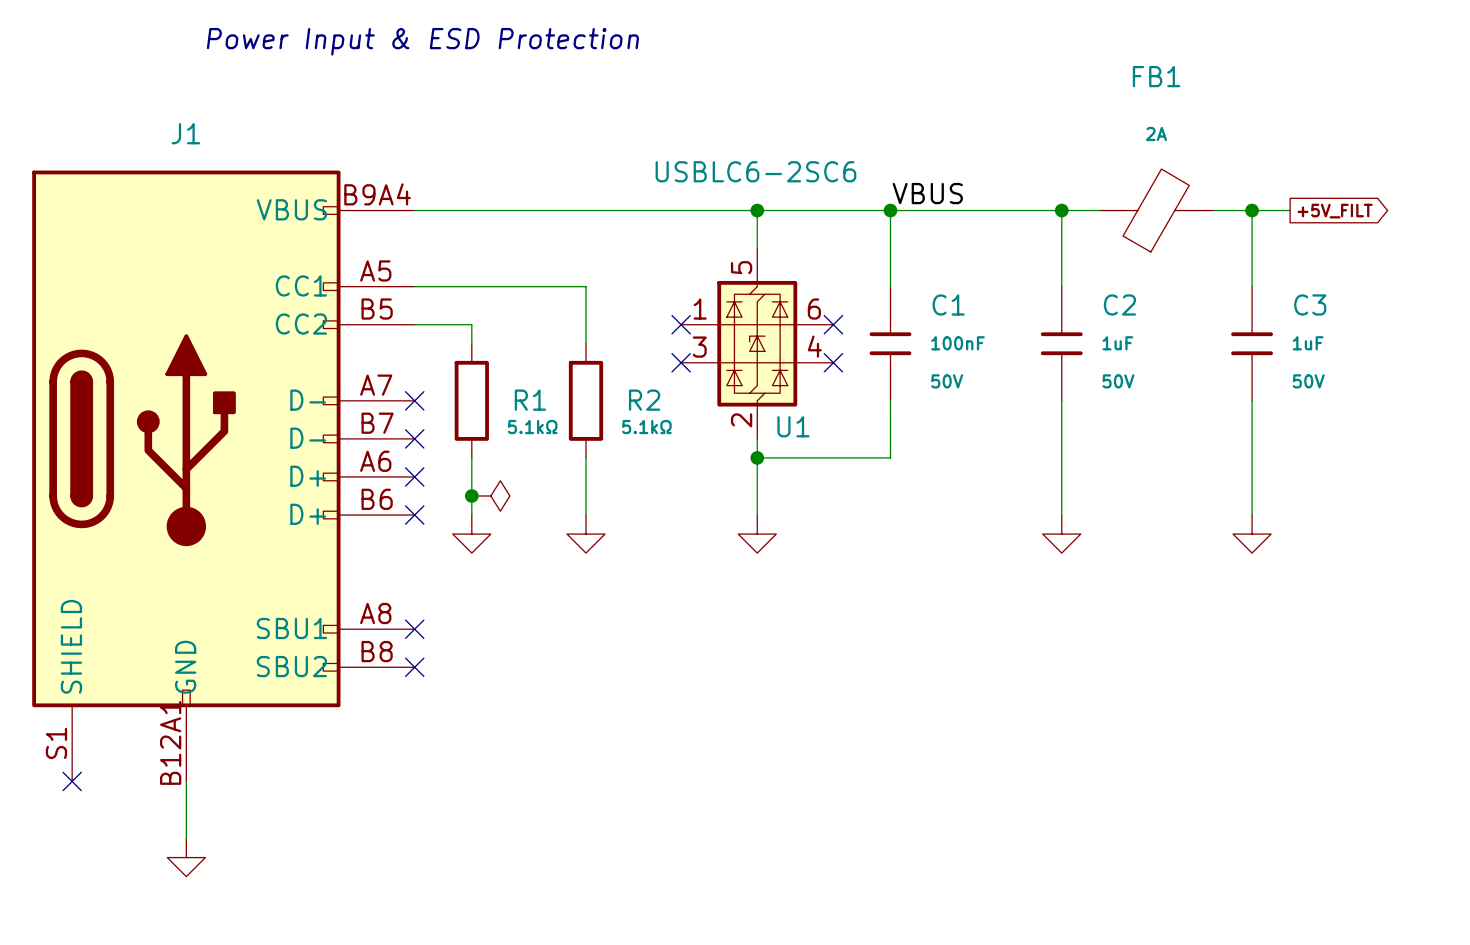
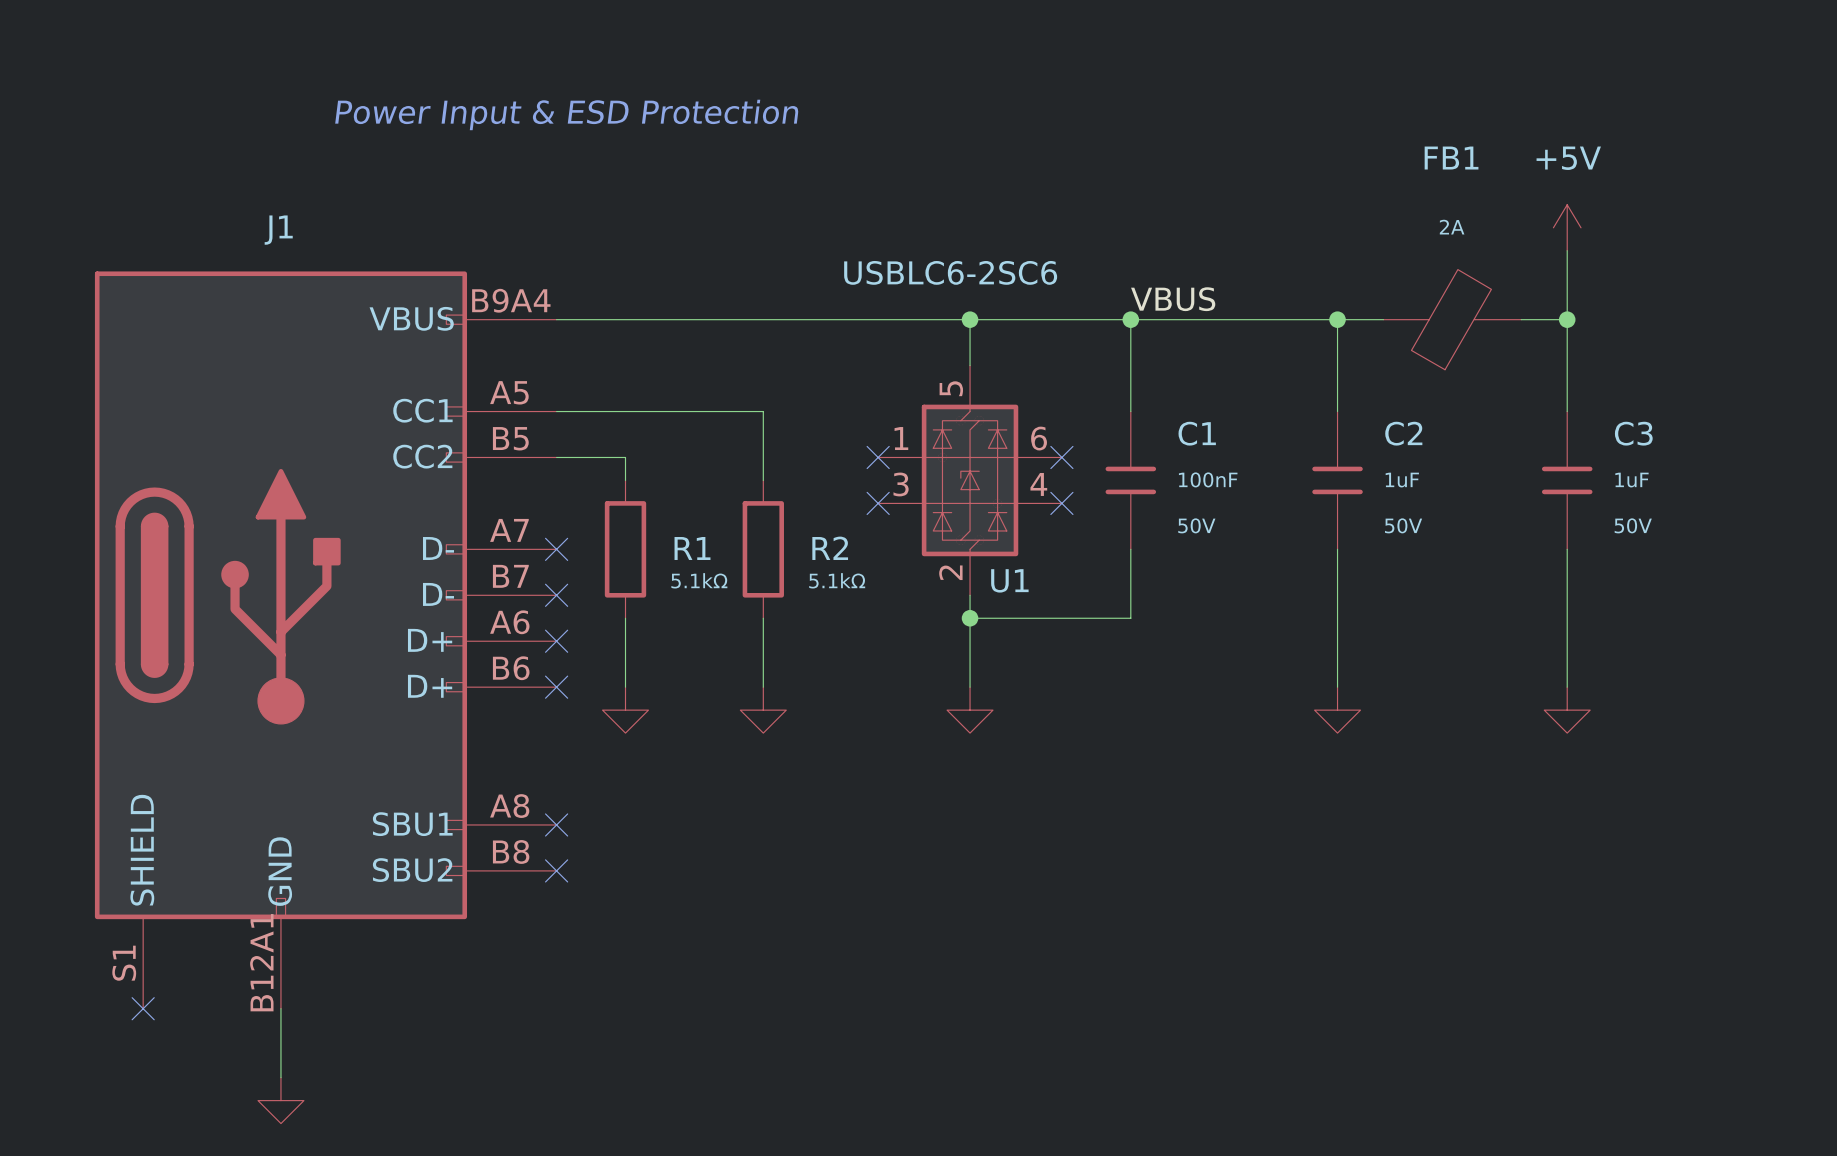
power symbol: none -> +5V (1567, 227)
wire: (1252, 210) (1290, 210) -> (1567, 319) (1567, 250)
global label: +5V_FILT (1335, 211) -> none
junction: (471, 496) -> none
power symbol: (490, 496) -> none

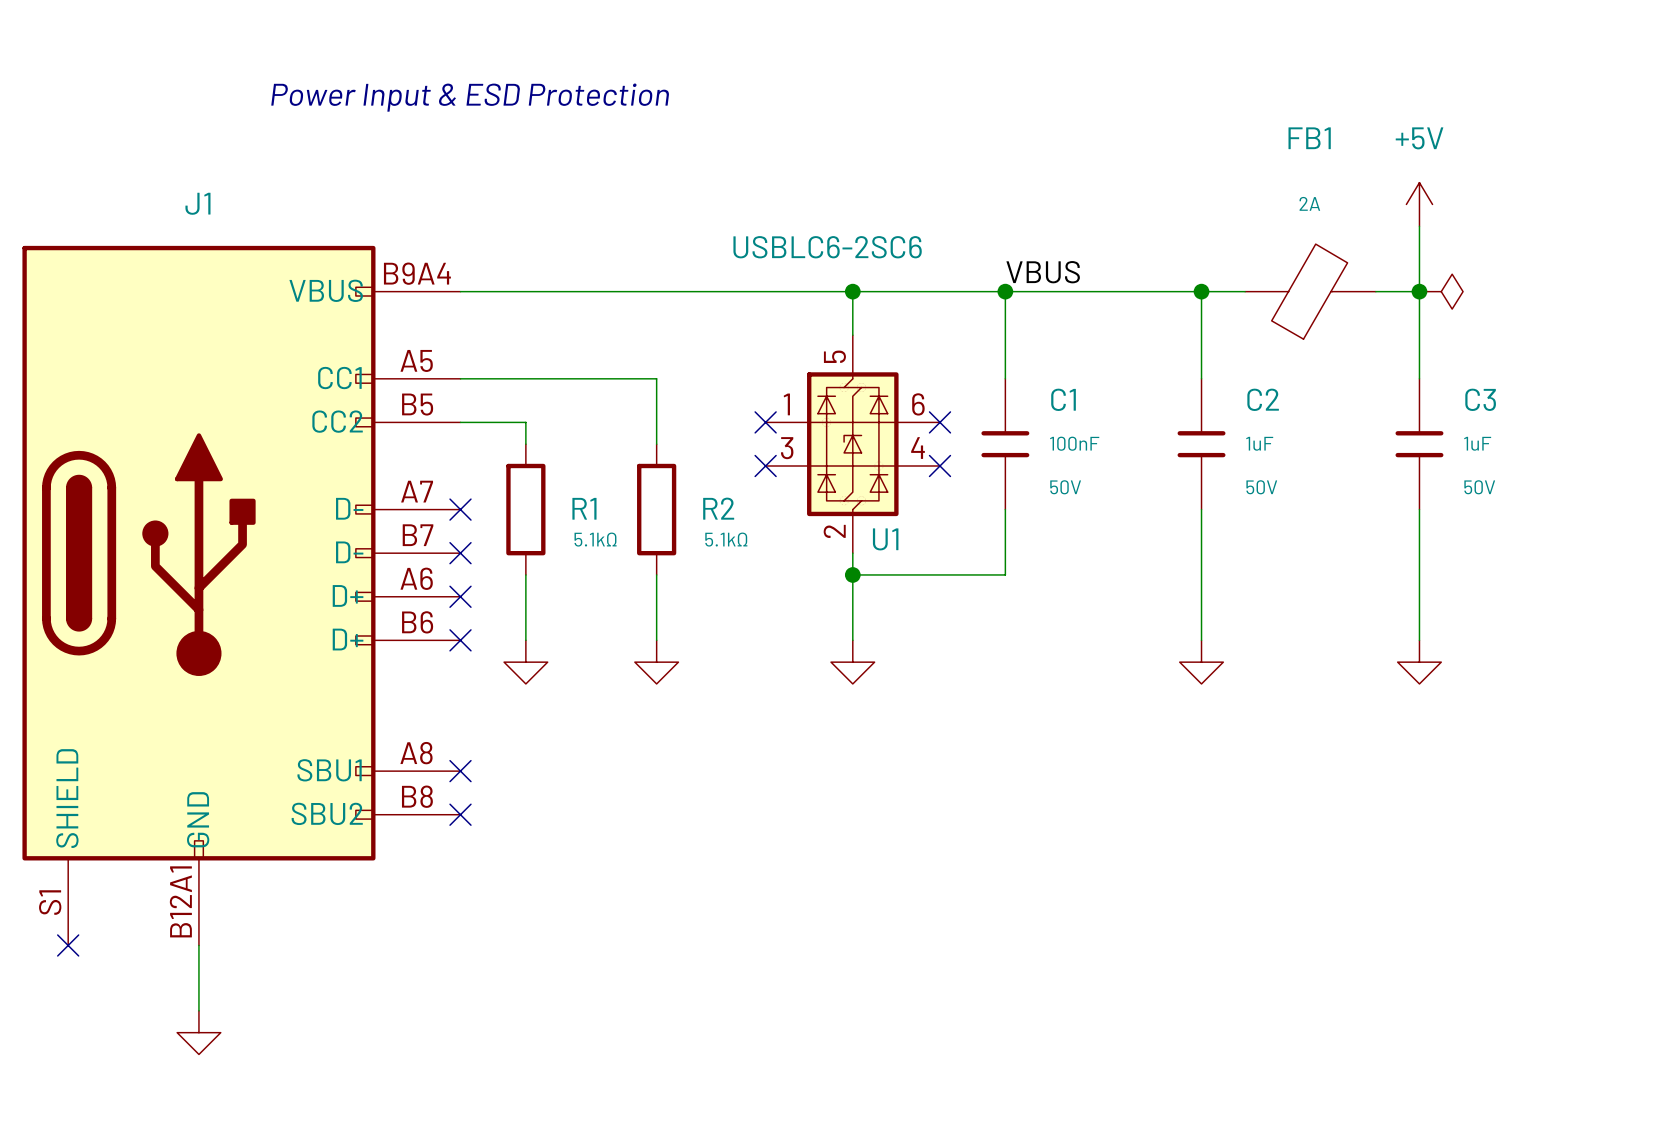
power symbol: none -> (1441, 291)

